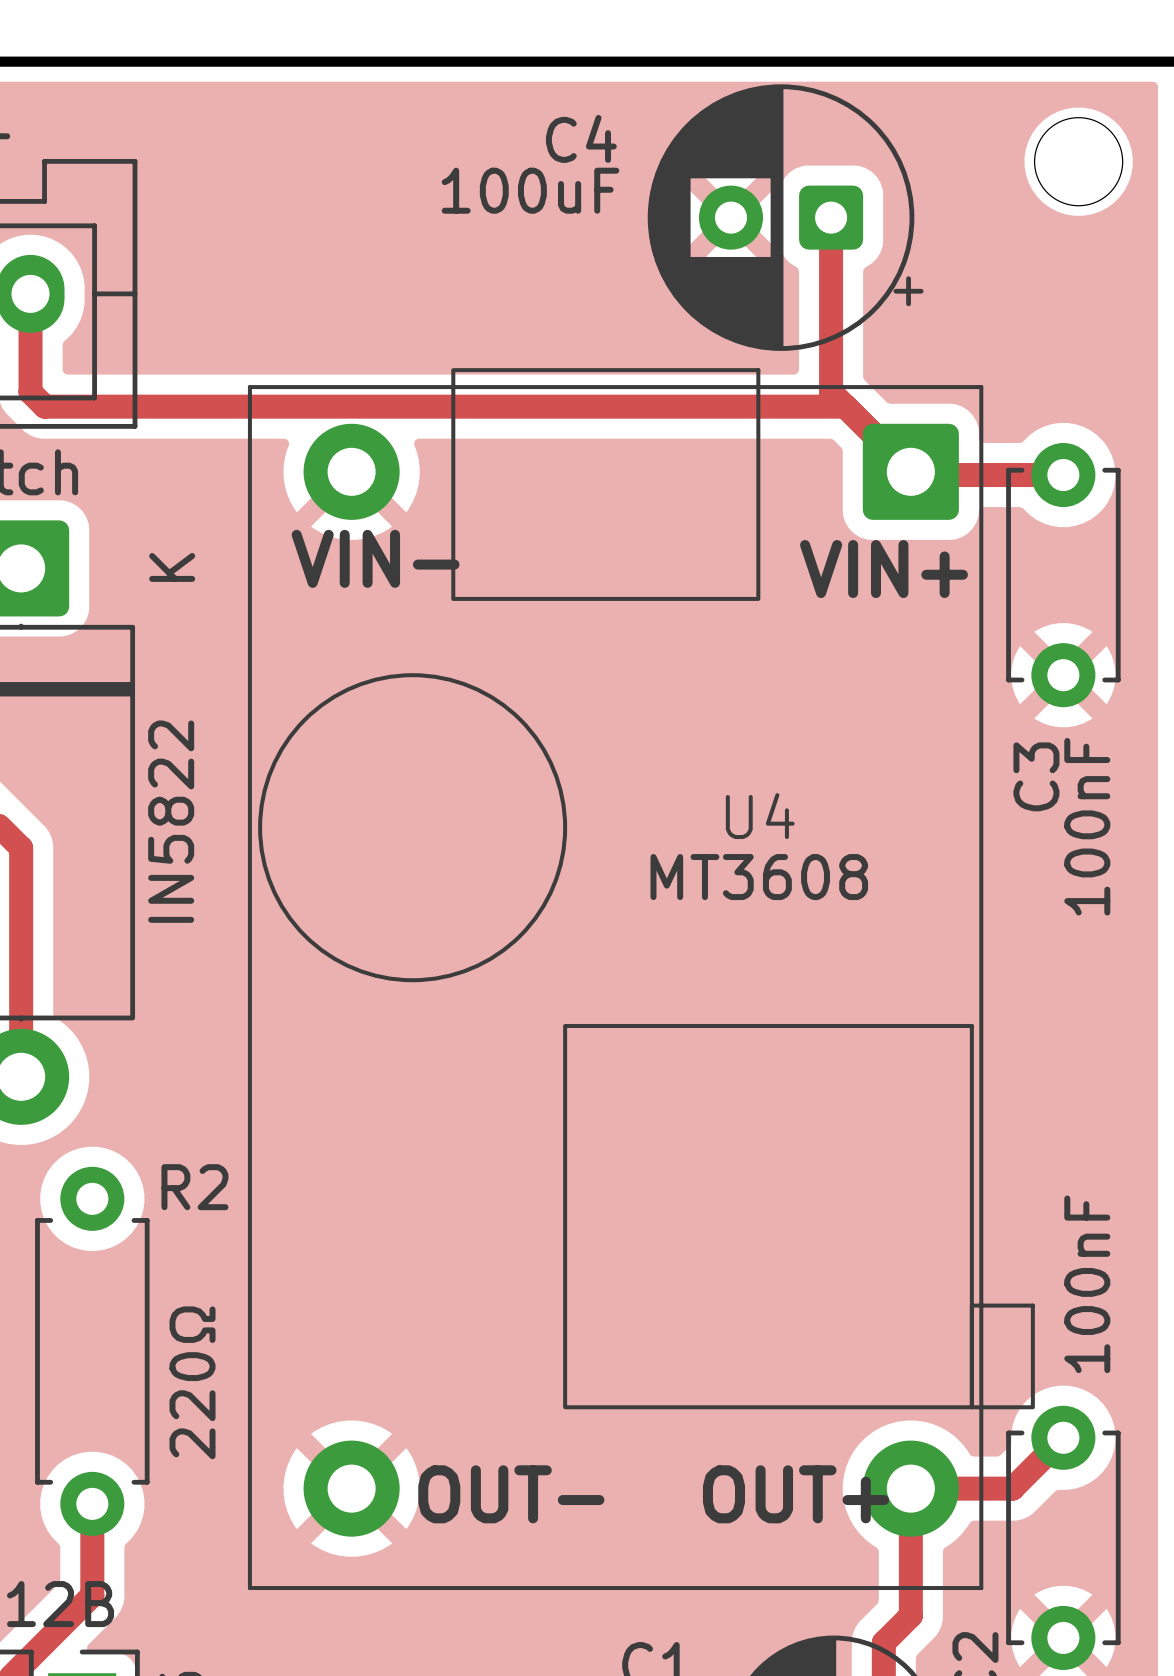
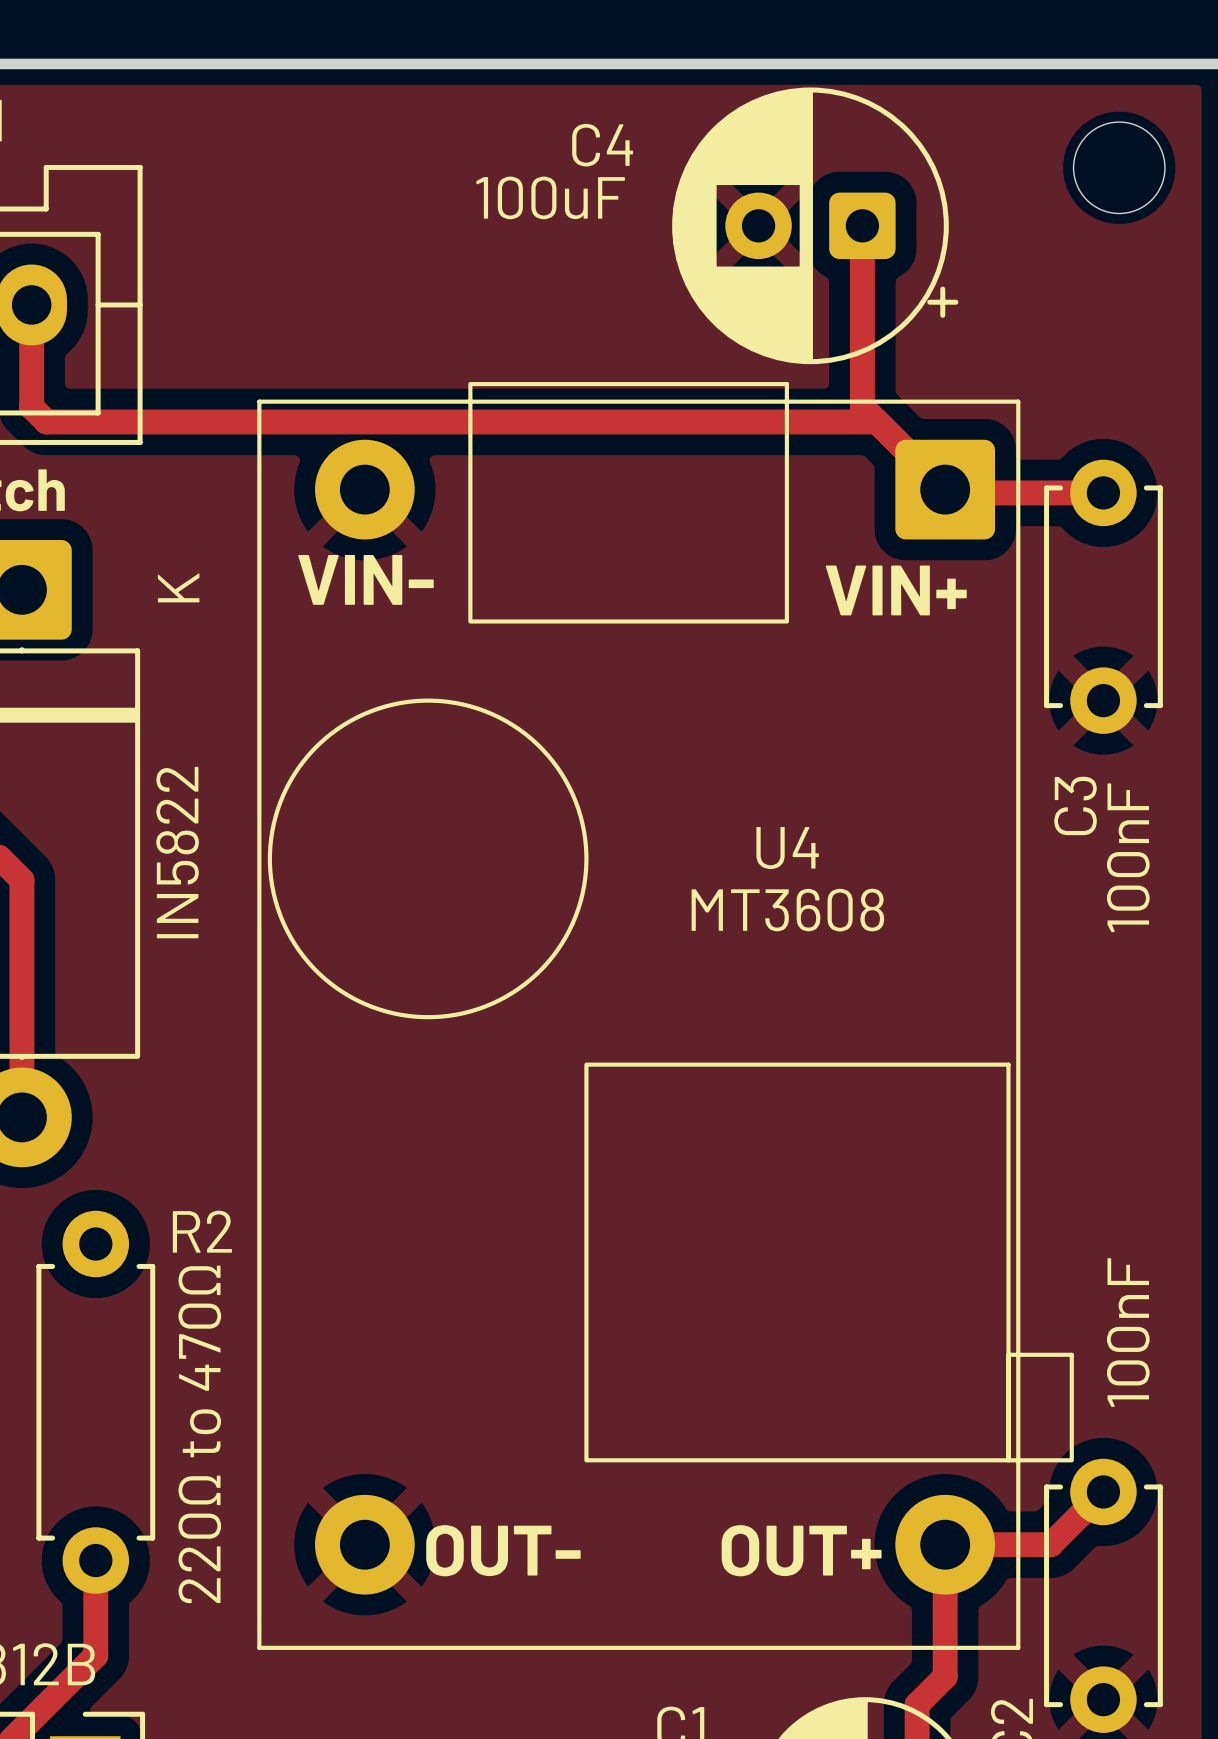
R2 value: 220Ω (192, 1382) -> 220Ω to 470Ω (199, 1434)

